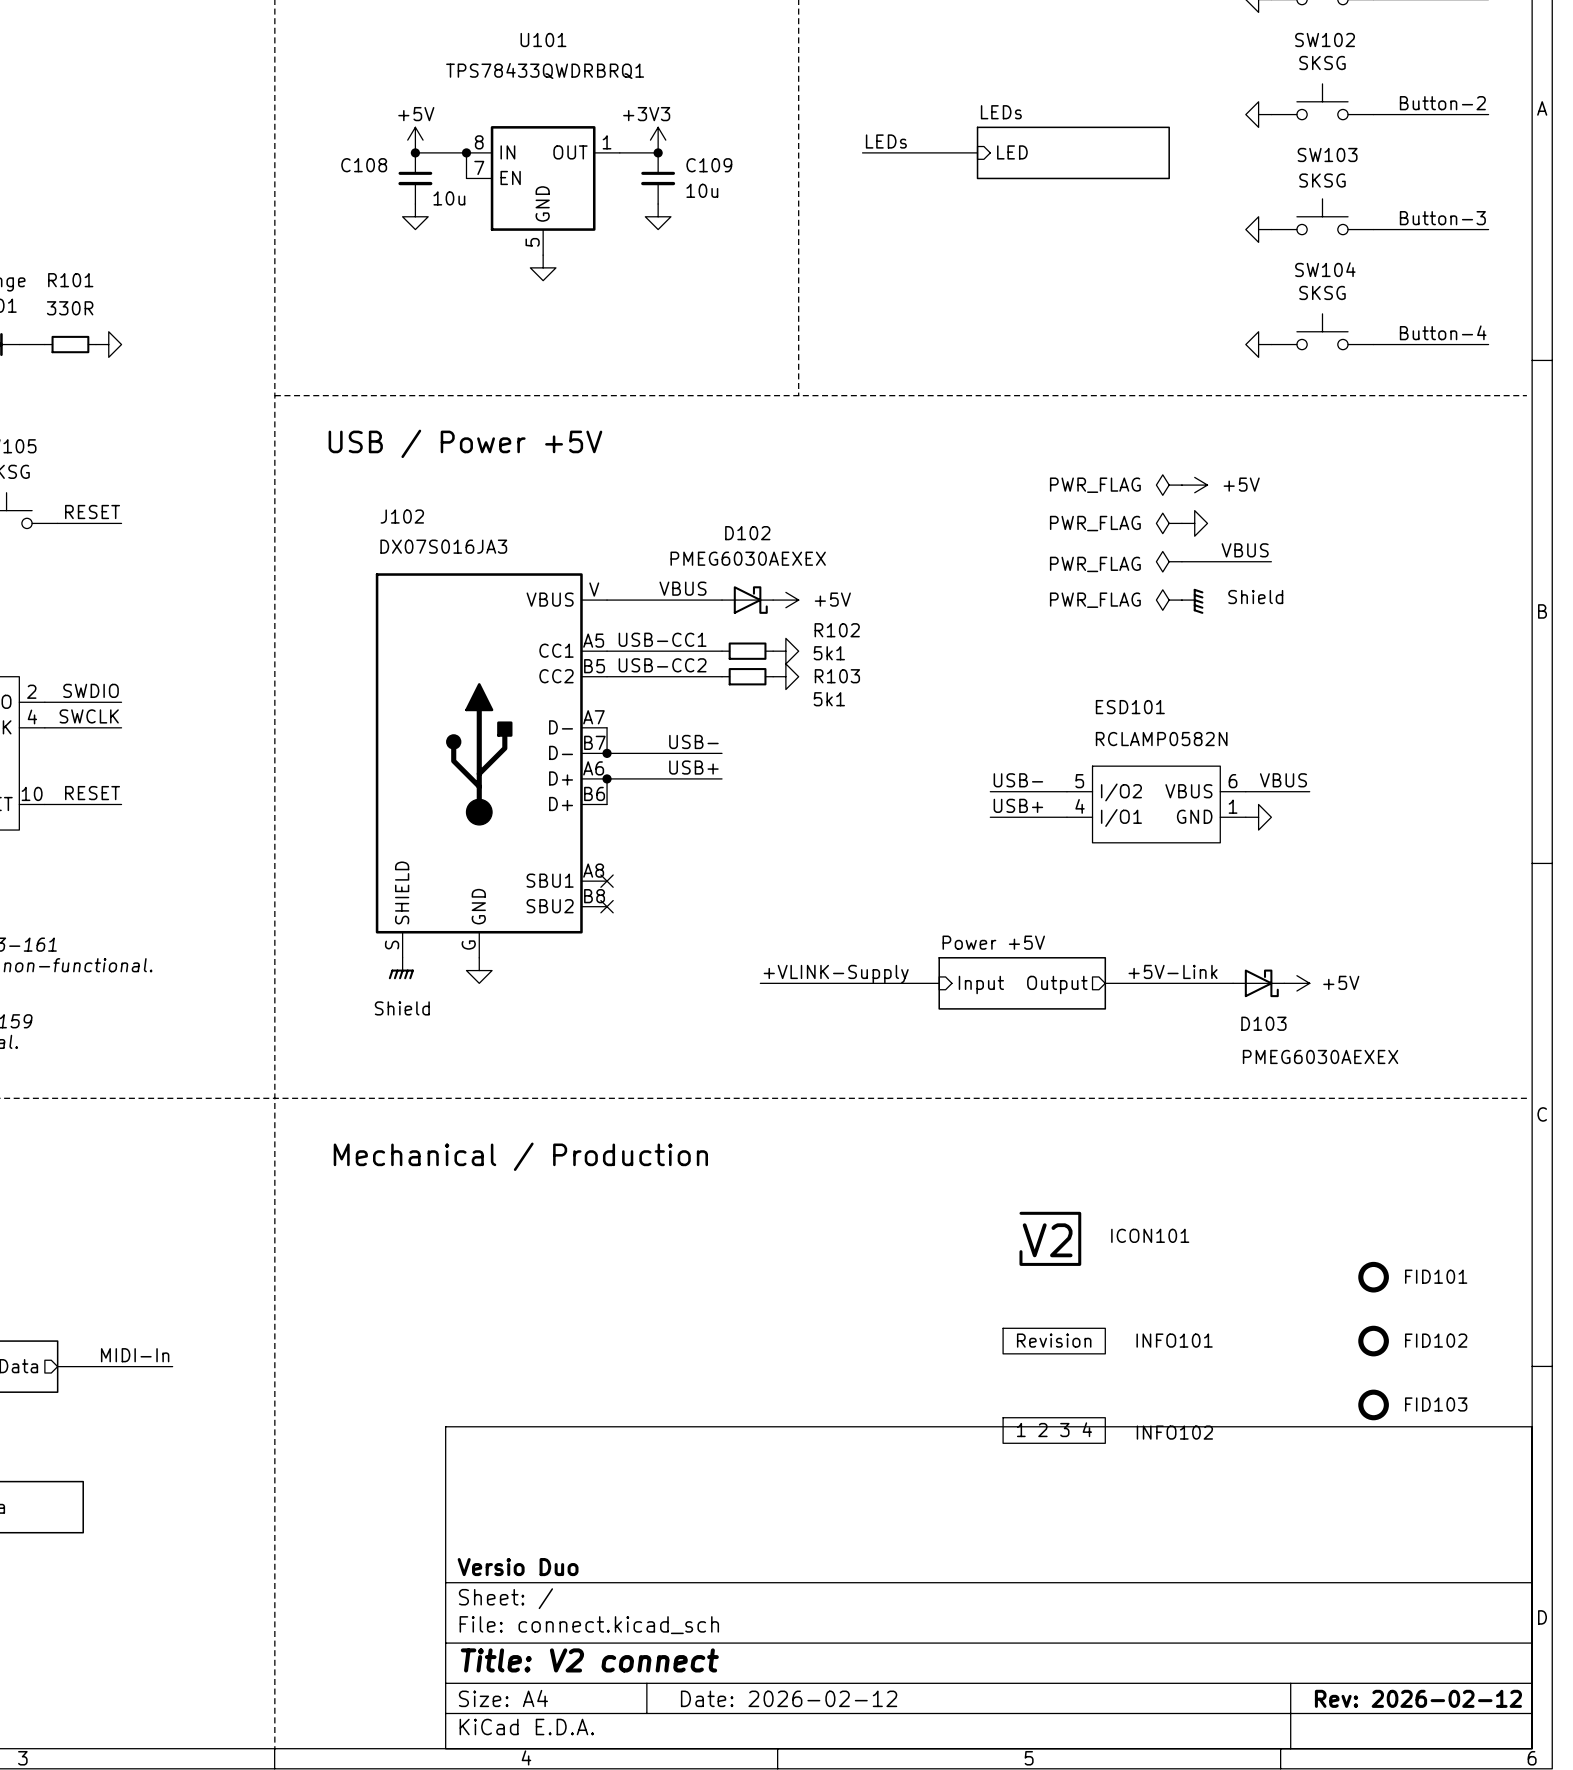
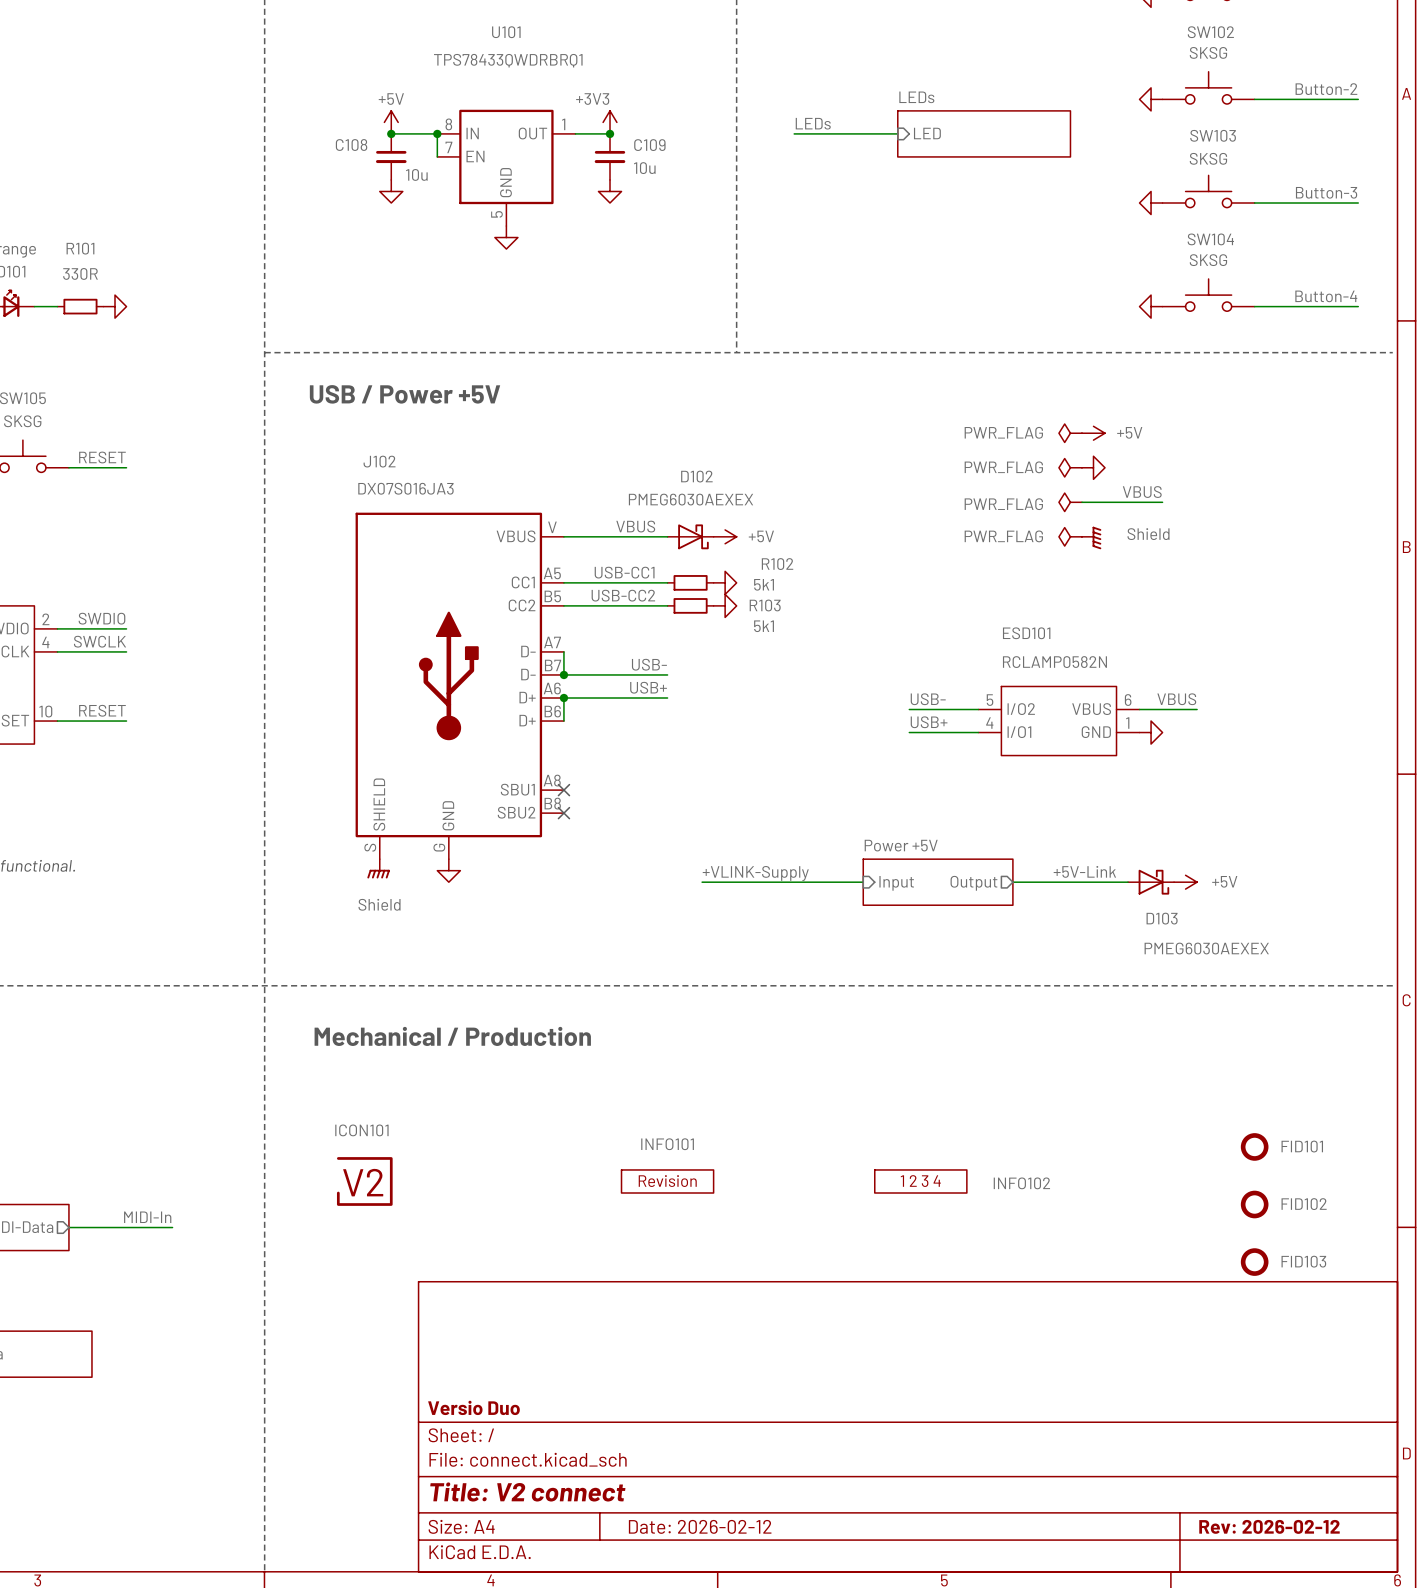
ICON101 name position: ICON101 (1150, 1235) -> ICON101 (361, 1130)
ICON101 position: (1050, 1238) -> (364, 1181)
INFO101 name position: INFO101 (1174, 1340) -> INFO101 (667, 1144)
INFO101 position: (1054, 1341) -> (667, 1181)
INFO102 position: (1054, 1430) -> (920, 1181)

